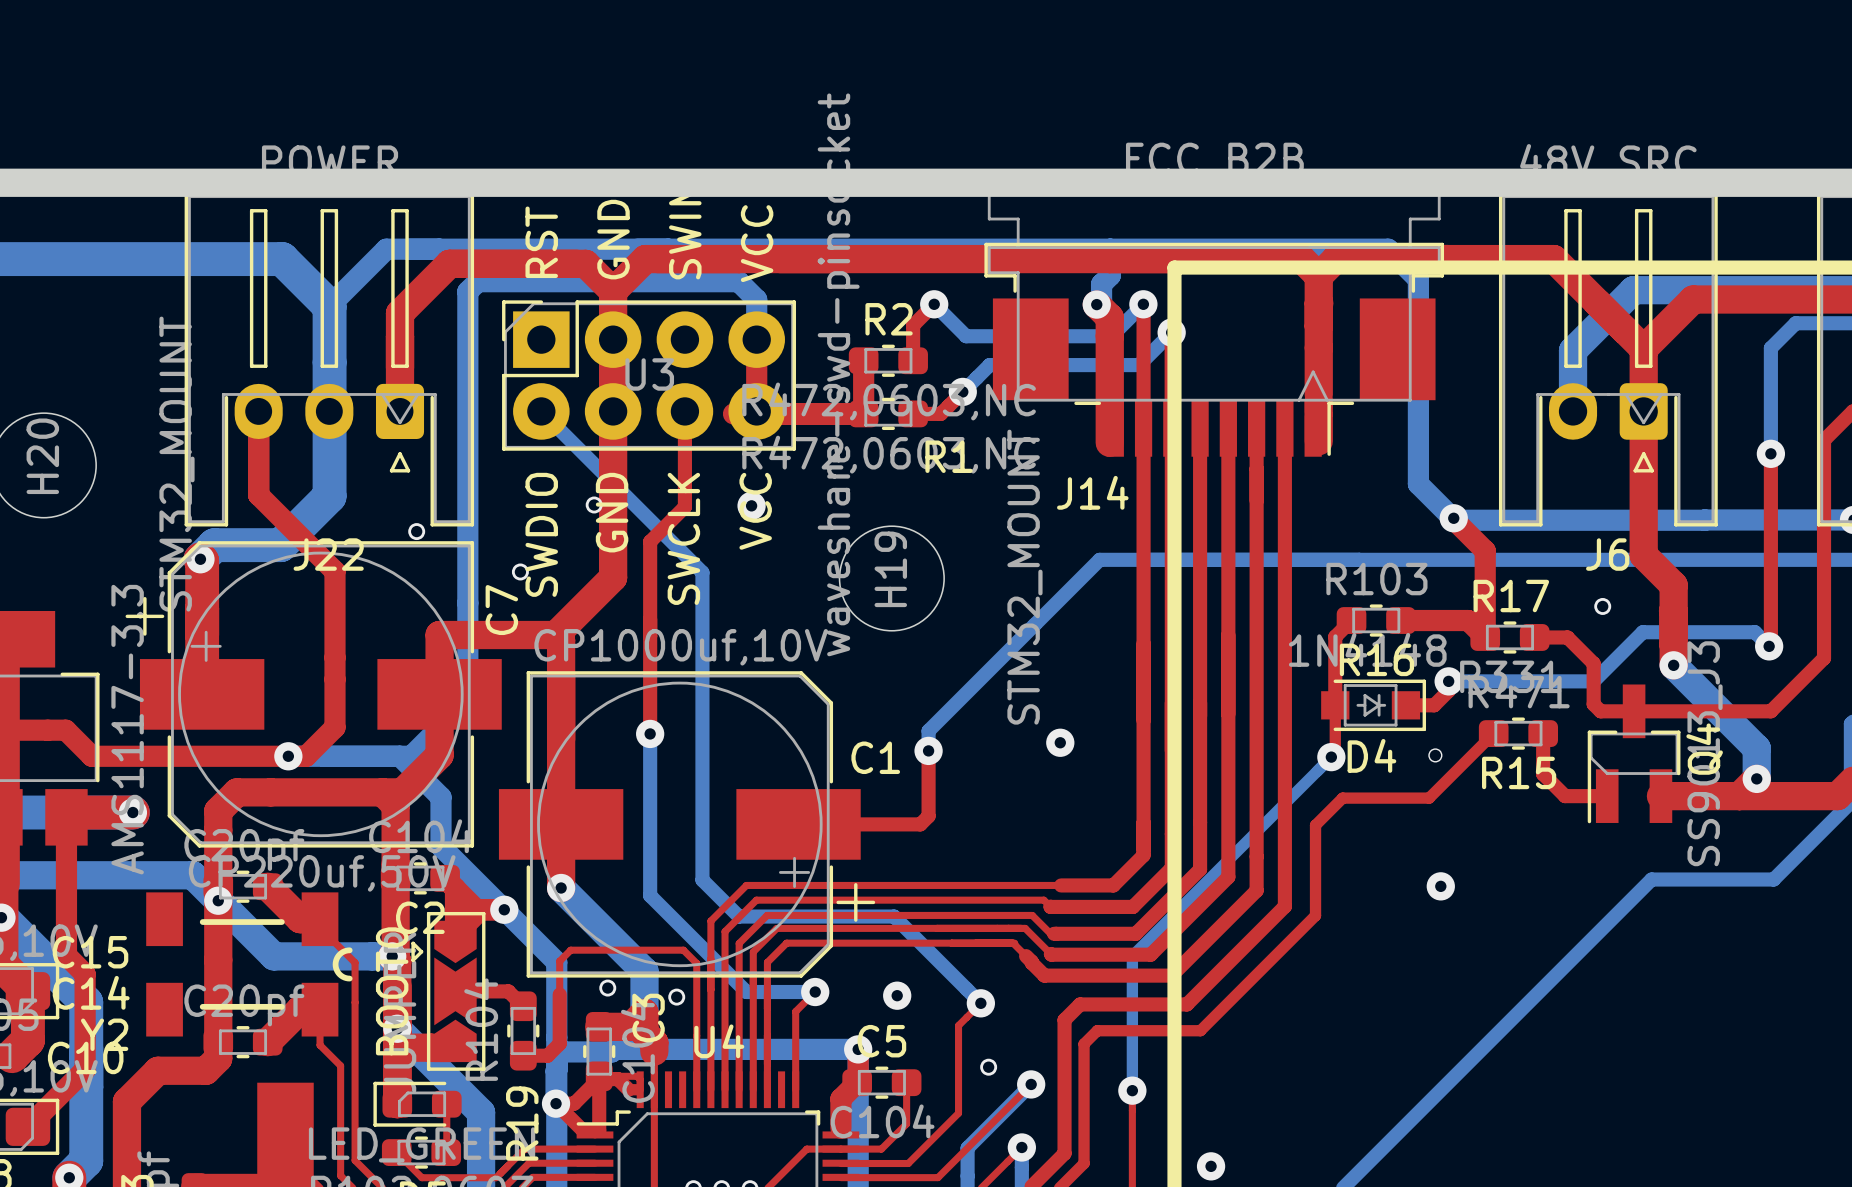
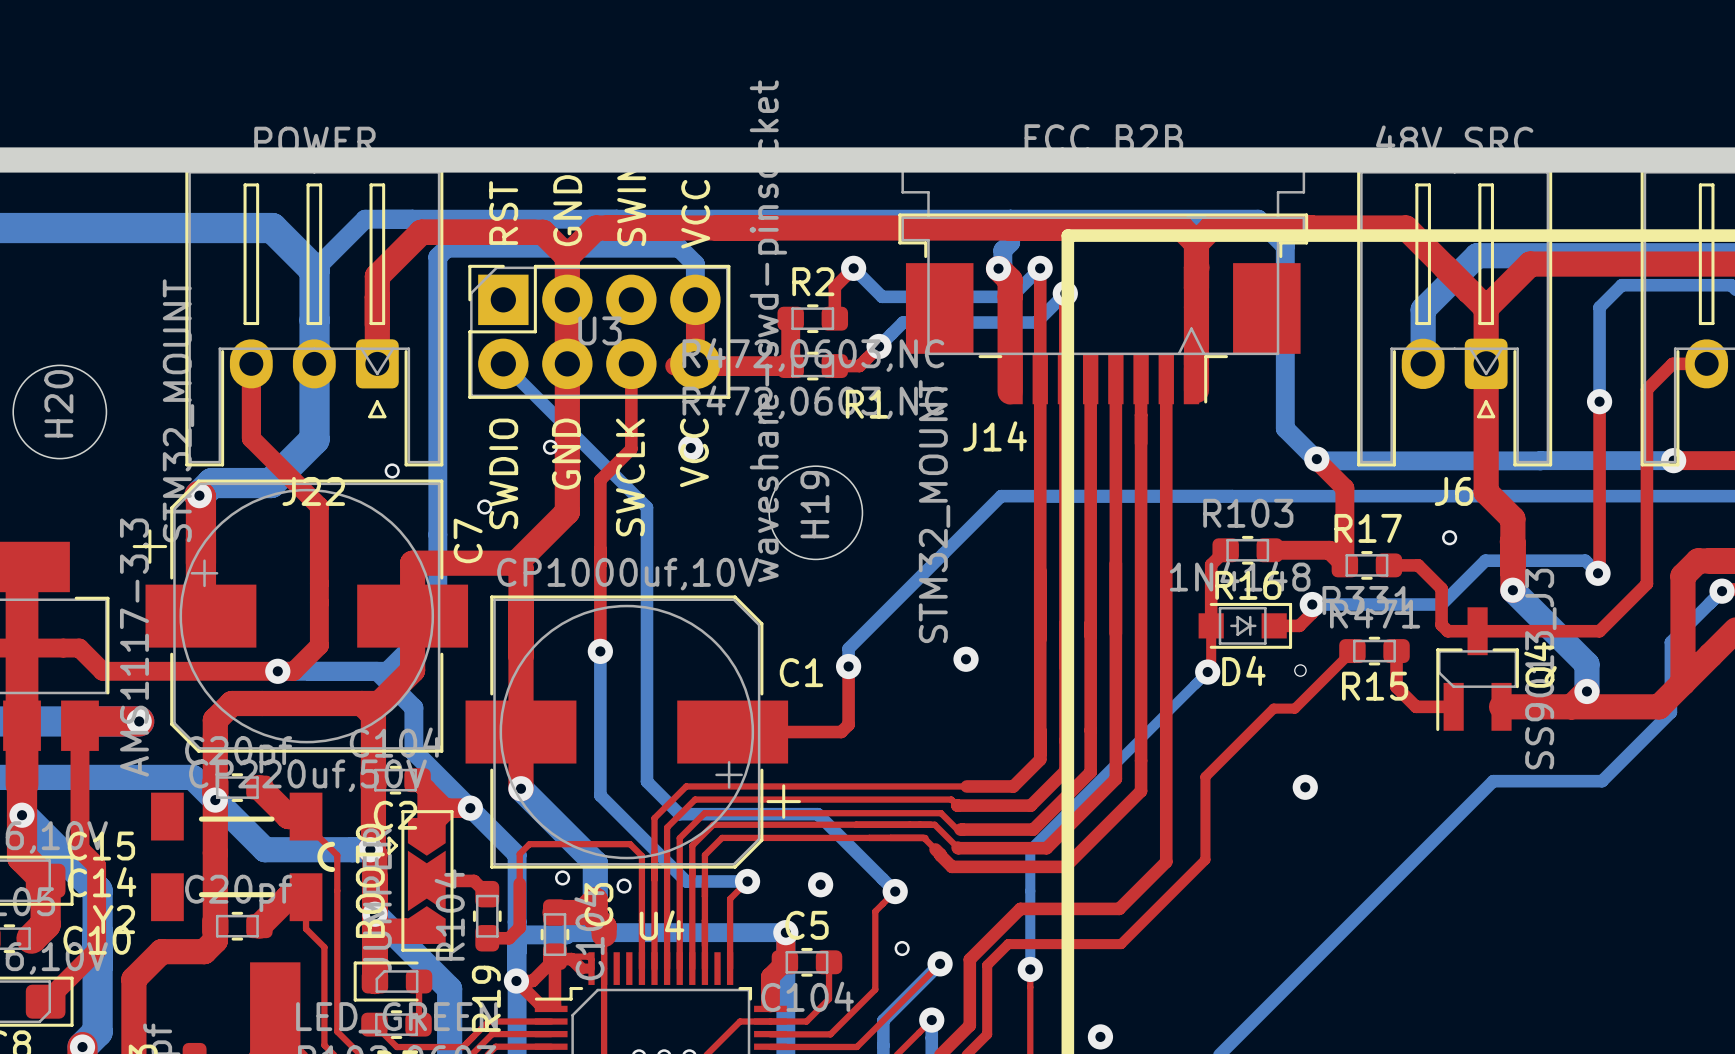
top track: (1405, 798) (1342, 798) (1315, 825) (1315, 915) (1200, 1030) (1097, 1030) (1084, 1044) (1084, 1086) -> (1273, 708) (1205, 776) (1205, 859) (1121, 944) (1008, 944) (987, 965)
top track: (1284, 906) (1186, 1004) (1080, 1004) (1064, 1019) (1064, 1079) -> (1166, 805) (1166, 861) (1119, 908) (1020, 908) (969, 959)

